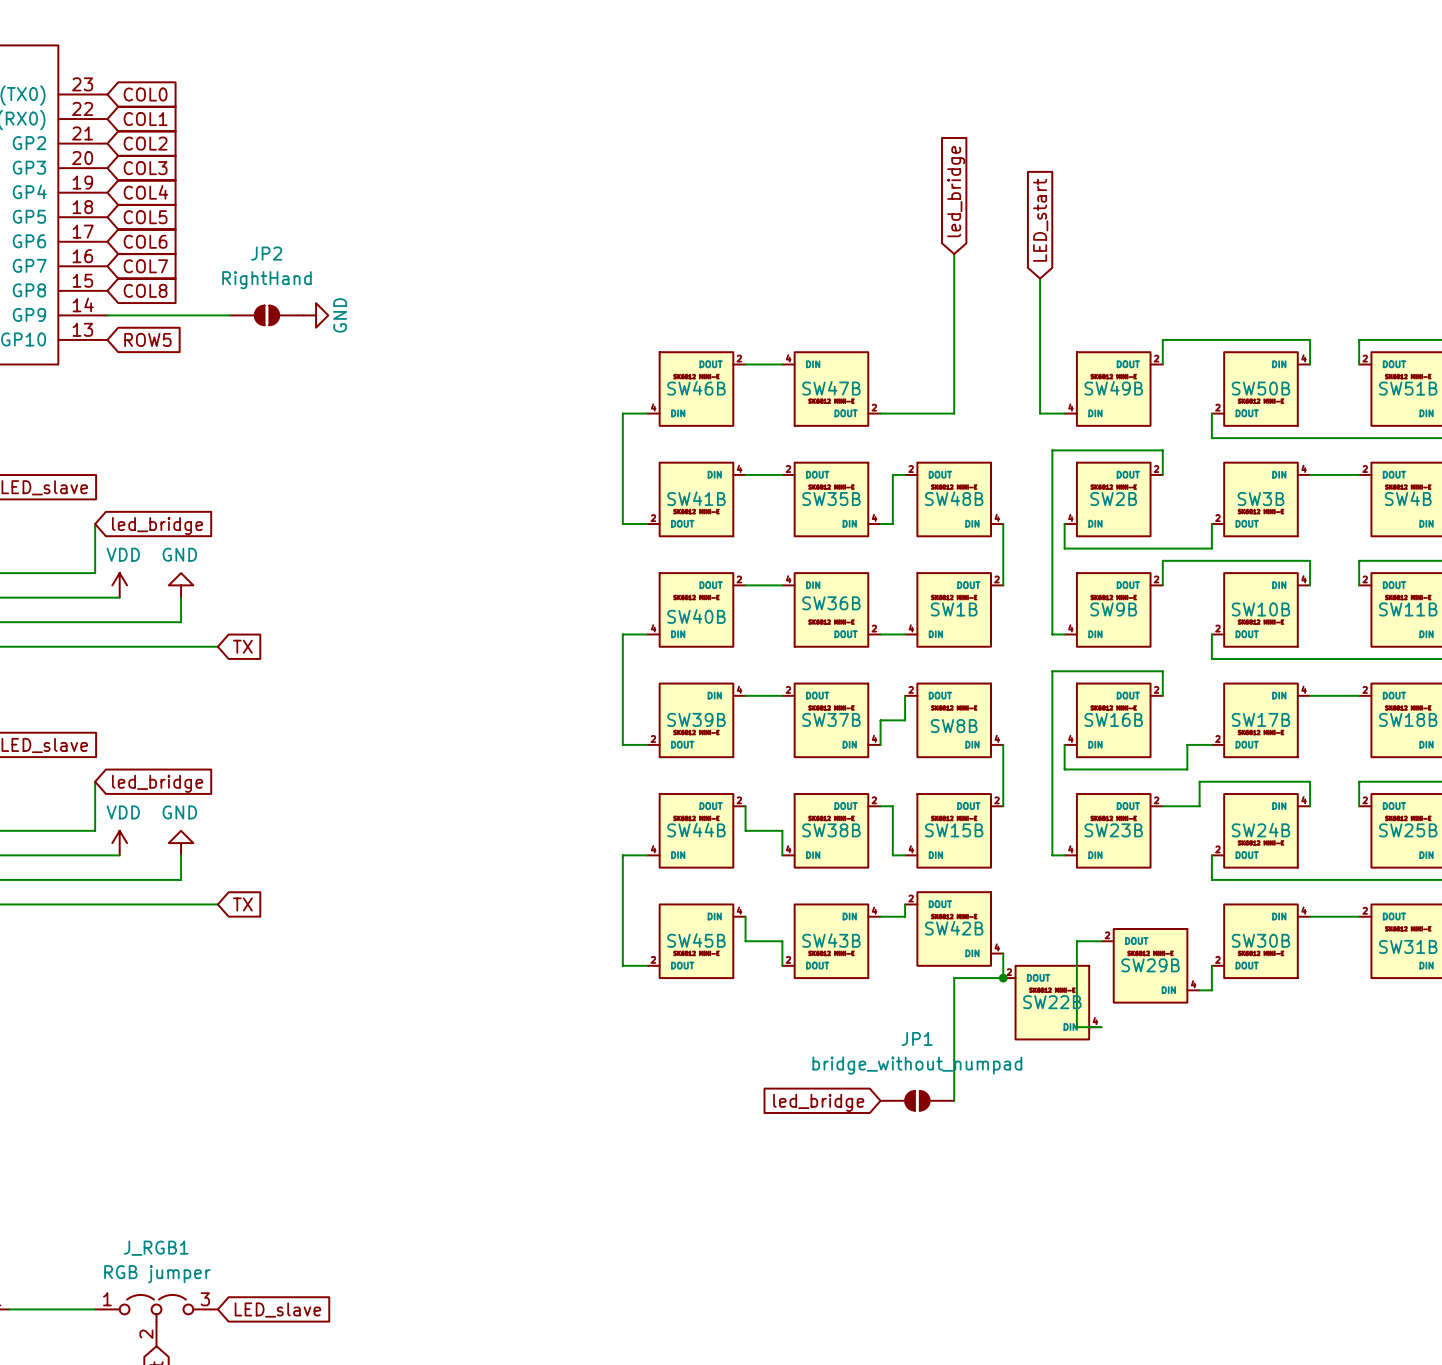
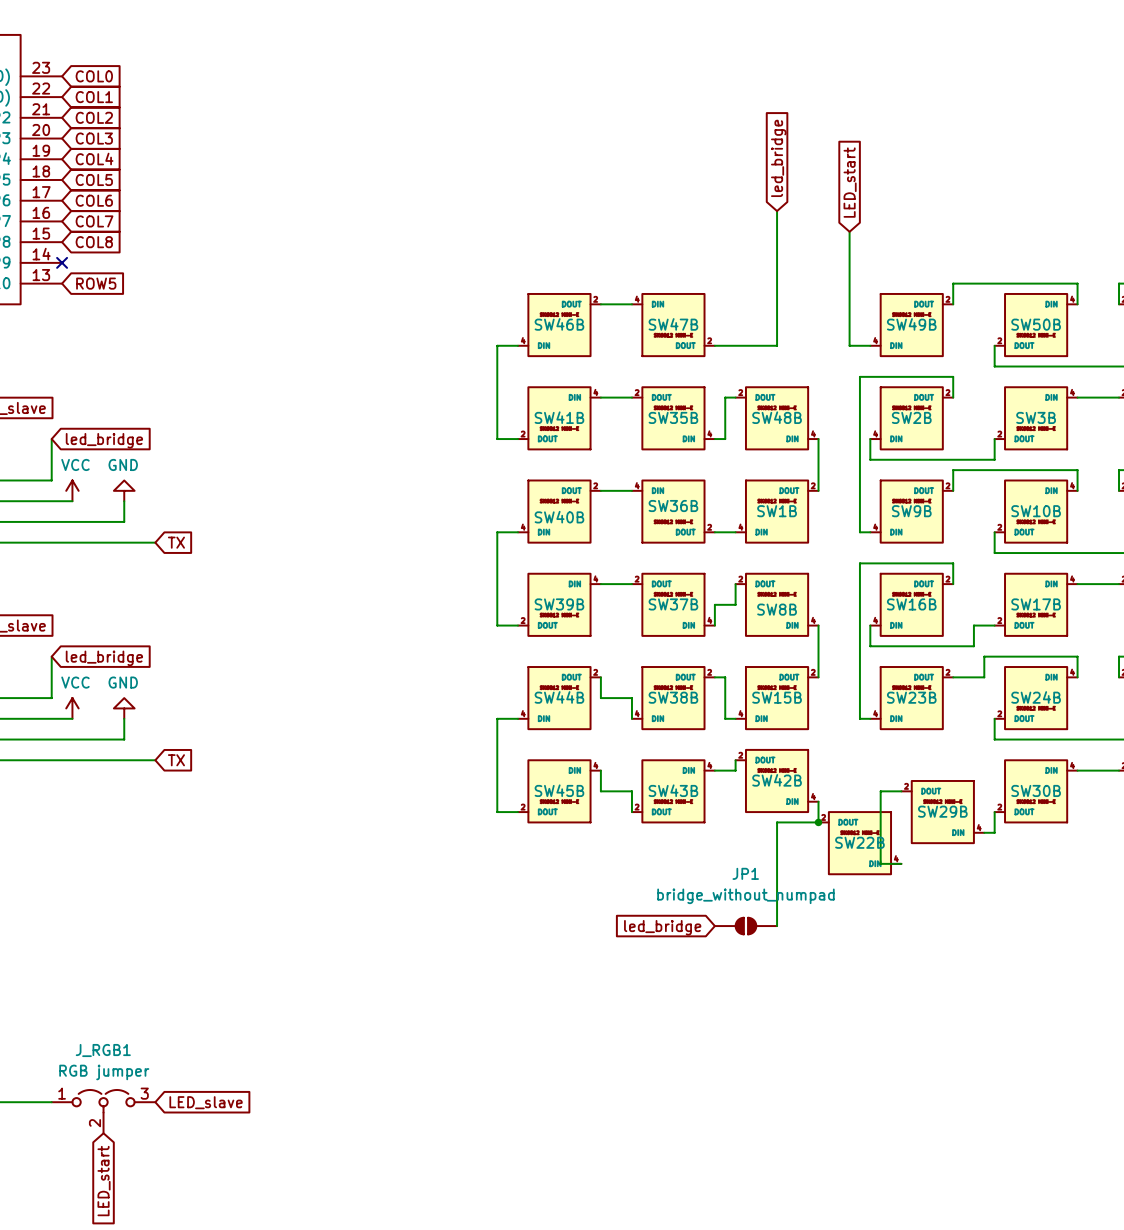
wire: (107, 315) (230, 315) -> none
no-connect mark: none -> (62, 262)
JP2: RightHand (266, 315) -> none
power symbol: GND (316, 315) -> none
power symbol: VDD (119, 585) -> VCC (72, 490)
power symbol: VDD (119, 843) -> VCC (72, 708)

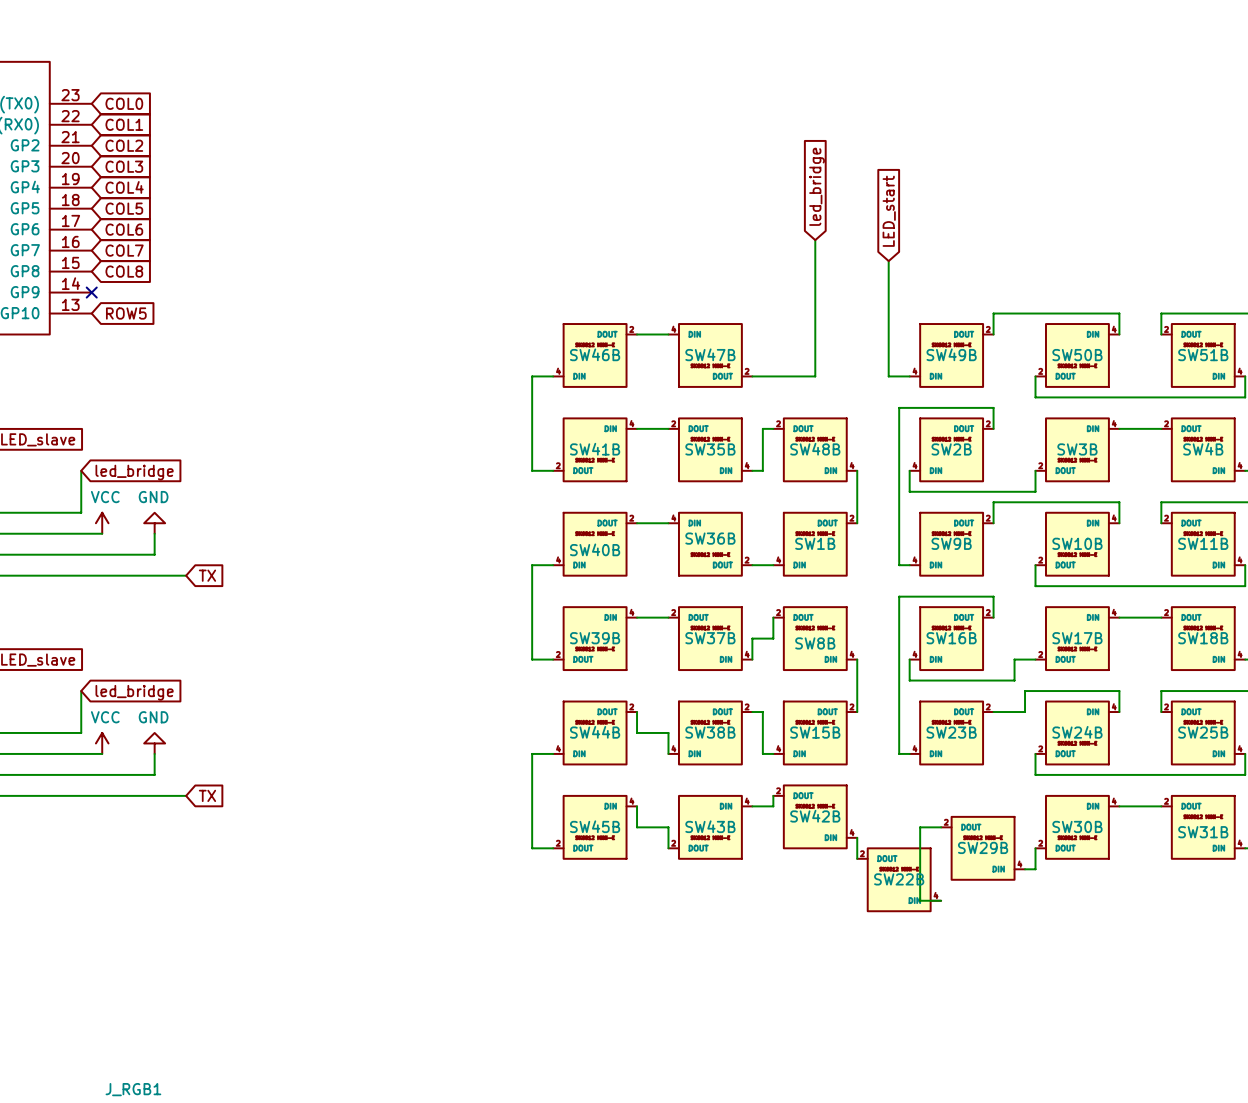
wire: (818, 822) (777, 822) (777, 926) -> none
junction: (818, 822) -> none
JP1: bridge_without_numpad (745, 926) -> none
global label: led_bridge (662, 927) -> none

